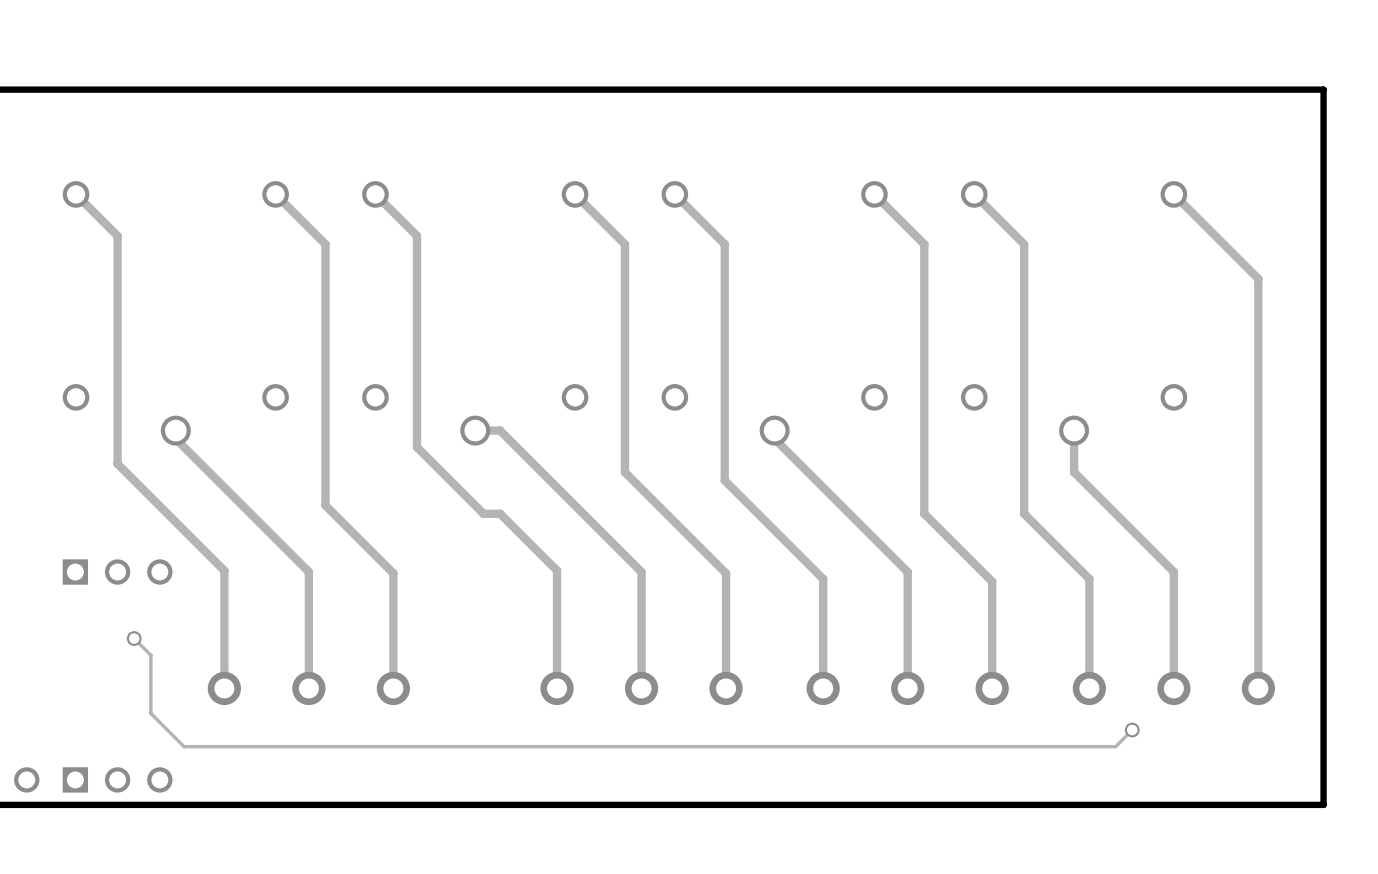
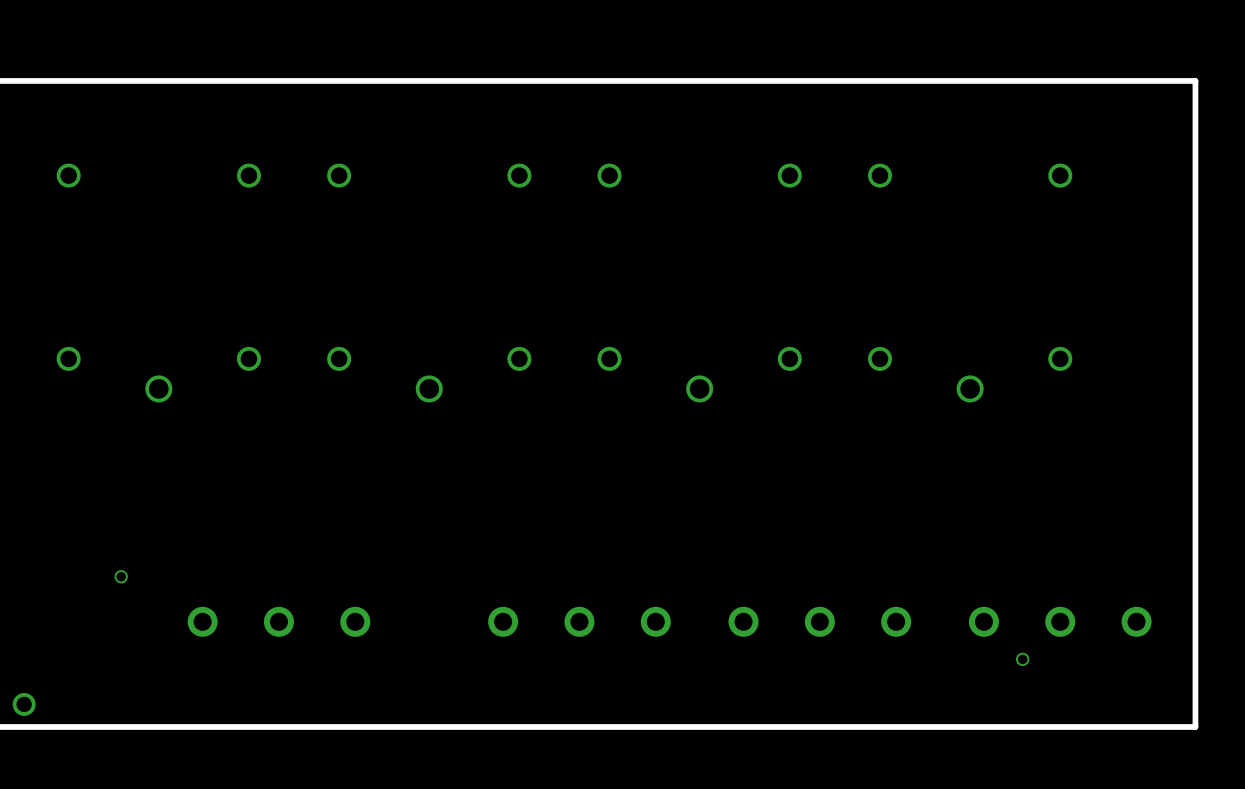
track: (76, 194) (117, 235) (117, 463) (224, 570) (224, 688) -> none
track: (275, 194) (325, 244) (325, 505) (393, 573) (393, 688) -> none
track: (375, 194) (416, 235) (416, 447) (483, 513) (500, 513) (557, 570) (557, 688) -> none
track: (575, 194) (624, 244) (624, 472) (726, 573) (726, 688) -> none
track: (674, 194) (724, 244) (724, 480) (823, 578) (823, 688) -> none
track: (874, 194) (924, 244) (924, 513) (992, 581) (992, 688) -> none
track: (974, 194) (1024, 244) (1024, 513) (1089, 579) (1089, 688) -> none
track: (1173, 194) (1258, 278) (1258, 688) -> none
track: (175, 430) (175, 438) (308, 572) (308, 688) -> none
track: (475, 430) (500, 430) (641, 572) (641, 688) -> none
track: (774, 430) (774, 438) (907, 571) (907, 688) -> none
track: (1074, 430) (1074, 472) (1173, 571) (1173, 688) -> none
part: (117, 572) -> none
track: (134, 638) (150, 655) (150, 713) (184, 746) (1115, 746) (1132, 730) -> none
part: (117, 779) -> none

